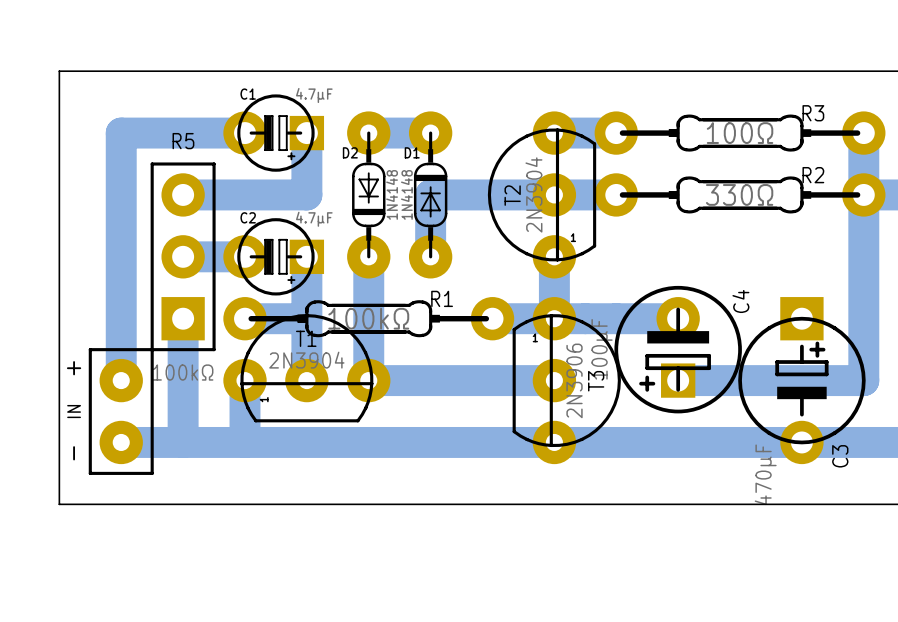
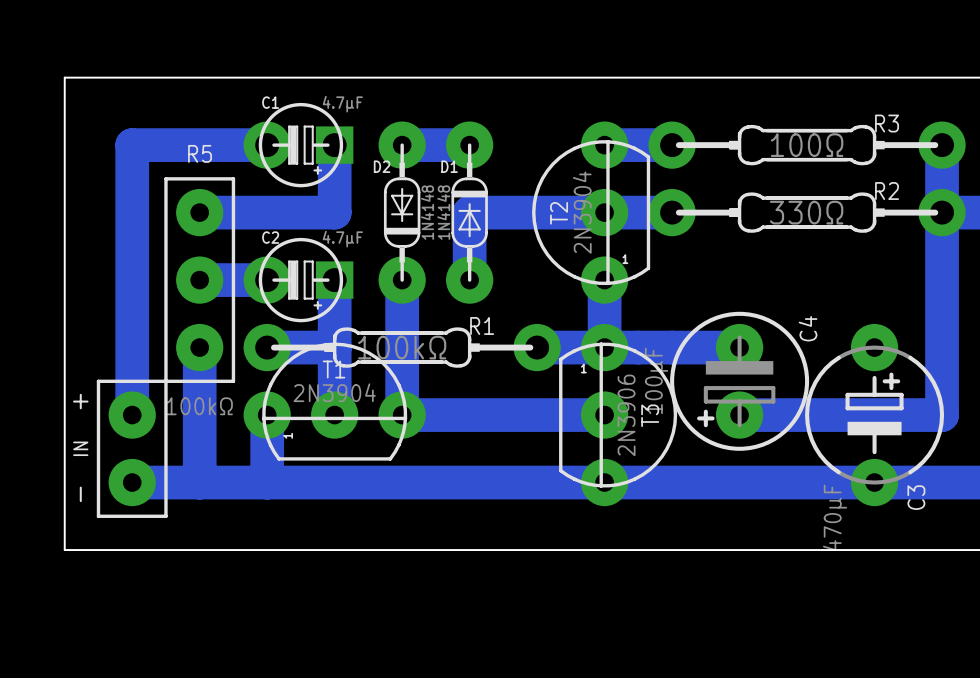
R5 footprint: [150, 162, 216, 352] -> [164, 177, 236, 384]
C4 footprint: [614, 285, 742, 414] -> [670, 311, 810, 451]
C3 footprint: [738, 297, 866, 465] -> [805, 323, 945, 507]

